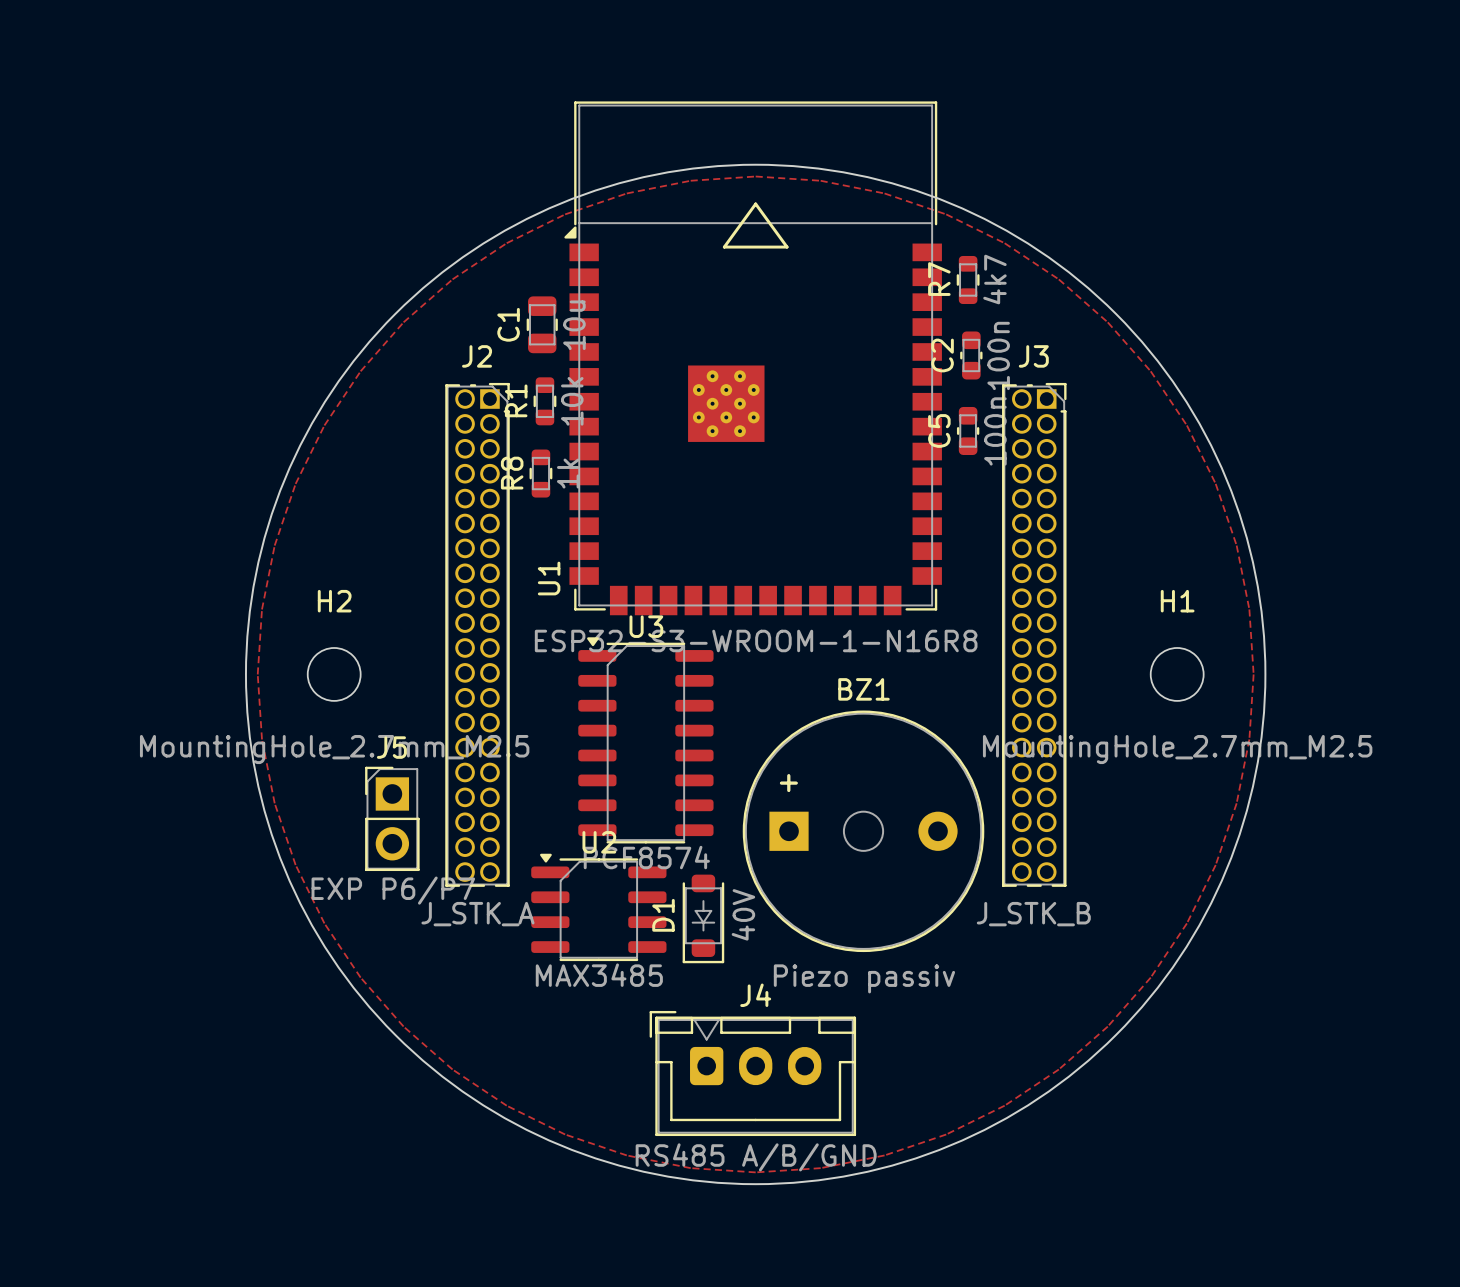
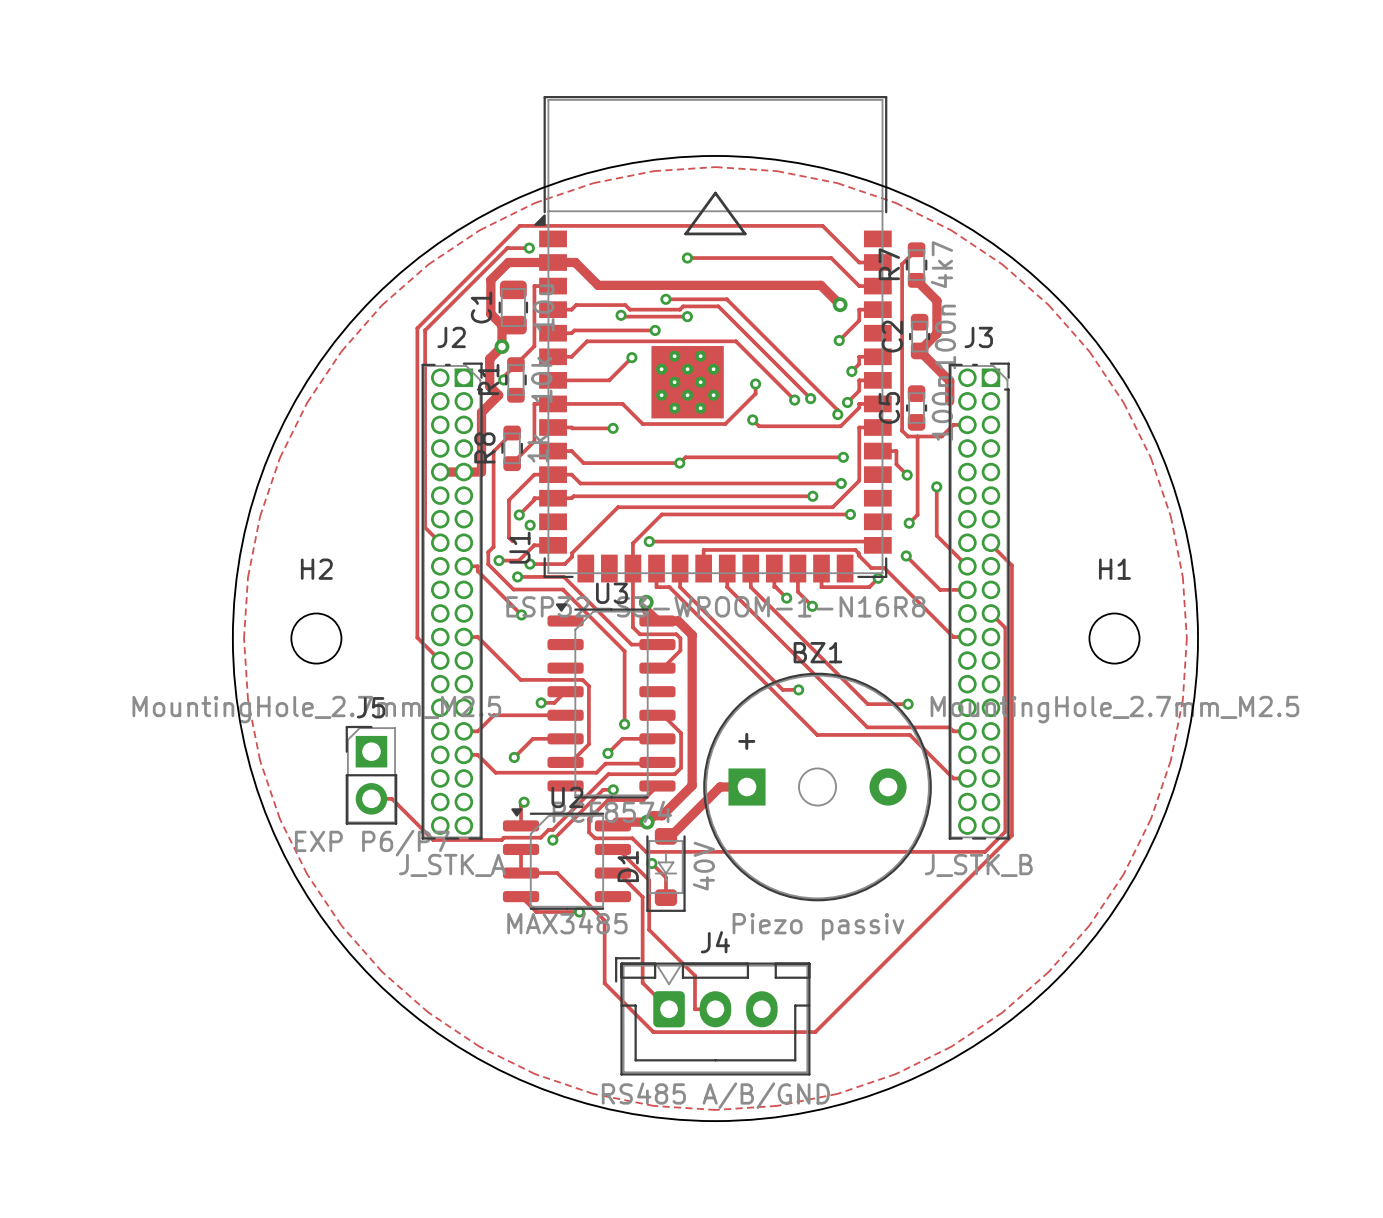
track: none -> (529, 248) (507, 248) (425, 330) (425, 527) (440, 542)
via: none -> (529, 248)
track: none -> (916, 249) (902, 264) (902, 430) (907, 436) (941, 436) (953, 424) (967, 424)
track: none -> (687, 258) (831, 258) (859, 286) (877, 286)
via: none -> (687, 258)
track: none -> (877, 262) (859, 262) (822, 225) (519, 225) (417, 328) (417, 637) (440, 660)
track: none -> (916, 280) (936, 300) (936, 333) (919, 350) (949, 381) (949, 401)
track: none -> (553, 286) (534, 286) (534, 346) (503, 376) (503, 379)
track: none -> (665, 299) (726, 299) (837, 410) (837, 414)
via: none -> (665, 299)
track: none -> (840, 304) (820, 285) (598, 285) (575, 262) (508, 262) (490, 280) (490, 314) (501, 325)
via: none -> (840, 304)
track: none -> (553, 309) (571, 309) (576, 305) (625, 305) (629, 309) (679, 309) (683, 306) (718, 306) (810, 398)
track: none -> (877, 309) (859, 309) (859, 320) (839, 340)
track: none -> (621, 315) (687, 316)
via: none -> (621, 315)
via: none -> (687, 316)
track: none -> (501, 325) (501, 346) (489, 358) (489, 386) (498, 395) (481, 412) (481, 472) (440, 472)
track: none -> (655, 330) (574, 330) (571, 333) (553, 333)
via: none -> (655, 330)
via: none -> (839, 340)
via: none -> (501, 346)
track: none -> (553, 356) (571, 356) (587, 341) (735, 341) (794, 400)
track: none -> (877, 356) (859, 356) (859, 364) (851, 371)
track: none -> (631, 357) (609, 380) (553, 380)
via: none -> (631, 357)
via: none -> (851, 371)
via: none -> (503, 379)
track: none -> (877, 380) (859, 380) (859, 390) (847, 402)
track: none -> (755, 384) (755, 393) (725, 424) (642, 424) (622, 403) (534, 403) (534, 441) (512, 463)
via: none -> (755, 384)
via: none -> (810, 398)
via: none -> (794, 400)
via: none -> (847, 402)
track: none -> (877, 403) (859, 403) (859, 407) (840, 426) (759, 426) (752, 419)
via: none -> (837, 414)
via: none -> (752, 419)
track: none -> (553, 427) (613, 428)
track: none -> (877, 427) (859, 427) (859, 480) (832, 507) (617, 507) (572, 553) (572, 556) (564, 564) (529, 564)
via: none -> (613, 428)
track: none -> (512, 433) (493, 451) (493, 546) (488, 552) (488, 564) (513, 589) (562, 589) (624, 651) (624, 724)
track: none -> (917, 436) (917, 514) (909, 523)
track: none -> (553, 451) (571, 451) (583, 463) (679, 463) (685, 457) (843, 457)
track: none -> (877, 451) (896, 451) (896, 464) (907, 475)
via: none -> (843, 457)
via: none -> (679, 463)
via: none -> (907, 475)
track: none -> (841, 483) (580, 483) (571, 474) (534, 474) (508, 500) (508, 537) (512, 541)
via: none -> (841, 483)
track: none -> (936, 486) (936, 535) (967, 566)
via: none -> (936, 486)
track: none -> (812, 496) (573, 496) (571, 498) (534, 498) (519, 514)
via: none -> (812, 496)
via: none -> (519, 514)
track: none -> (850, 514) (661, 514) (632, 543) (632, 627) (639, 634) (676, 634) (680, 638) (680, 650) (662, 668) (657, 668)
via: none -> (850, 514)
via: none -> (909, 523)
via: none -> (530, 525)
track: none -> (649, 541) (874, 541) (877, 545)
via: none -> (649, 541)
track: none -> (989, 542) (1011, 565) (1011, 835) (815, 1032) (653, 1032) (604, 983) (604, 920) (557, 873) (521, 873) (521, 849)
track: none -> (553, 545) (534, 545) (518, 560) (499, 560)
track: none -> (906, 555) (940, 589) (967, 589)
via: none -> (906, 555)
via: none -> (499, 560)
via: none -> (529, 564)
track: none -> (463, 566) (477, 566) (477, 571) (521, 614)
track: none -> (656, 568) (656, 587) (669, 587) (817, 734) (909, 734) (953, 778) (967, 778)
track: none -> (680, 568) (680, 587) (782, 689) (798, 689)
track: none -> (703, 568) (703, 549) (855, 549) (871, 568) (884, 568) (953, 637) (967, 637)
track: none -> (727, 568) (727, 587) (867, 727) (949, 727) (953, 731) (967, 731)
track: none -> (750, 568) (750, 587) (867, 704) (908, 704)
track: none -> (774, 568) (774, 587) (786, 598)
track: none -> (797, 568) (797, 591) (812, 606)
track: none -> (821, 568) (821, 587) (869, 587) (878, 578)
track: none -> (517, 576) (563, 576) (631, 644) (657, 644)
via: none -> (517, 576)
via: none -> (878, 578)
via: none -> (786, 598)
track: none -> (646, 602) (646, 609) (657, 620) (678, 620) (692, 634) (692, 785) (662, 815) (653, 815) (647, 822) (616, 822) (612, 825)
via: none -> (646, 602)
via: none -> (812, 606)
track: none -> (990, 613) (1005, 627) (1005, 831) (985, 851) (645, 851) (632, 838) (595, 838) (589, 832) (589, 819) (607, 800) (643, 800) (657, 785)
via: none -> (521, 614)
track: none -> (463, 637) (477, 637) (520, 679) (582, 679) (588, 686) (588, 744) (570, 762) (565, 762)
via: none -> (798, 689)
track: none -> (565, 691) (554, 702) (541, 702)
via: none -> (541, 702)
via: none -> (908, 704)
track: none -> (565, 715) (493, 715) (477, 731) (463, 731)
track: none -> (657, 715) (663, 715) (681, 733) (681, 767) (674, 774) (608, 774) (552, 829) (548, 829) (540, 837) (433, 840) (391, 798) (371, 798)
via: none -> (624, 724)
track: none -> (565, 738) (532, 738) (514, 757)
track: none -> (657, 738) (622, 738) (607, 753)
via: none -> (607, 753)
track: none -> (463, 754) (477, 754) (495, 772) (596, 772) (605, 763) (657, 762)
via: none -> (514, 757)
track: none -> (746, 787) (720, 787) (670, 836) (665, 836)
track: none -> (613, 789) (603, 789) (552, 840)
via: none -> (613, 789)
track: none -> (524, 802) (521, 805) (521, 825)
via: none -> (524, 802)
via: none -> (647, 822)
via: none -> (552, 840)
track: none -> (612, 849) (618, 849) (649, 880) (649, 929) (694, 975) (694, 1009) (715, 1009)
track: none -> (651, 863) (665, 877) (665, 897)
via: none -> (651, 863)
track: none -> (612, 873) (618, 873) (642, 897) (642, 982) (669, 1009)
track: none -> (521, 896) (536, 912) (579, 912)
via: none -> (579, 912)

